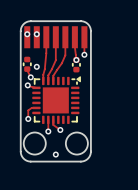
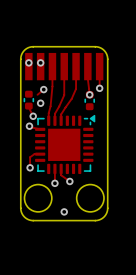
track: none -> (43, 89) (37, 94)
via: none -> (43, 89)

